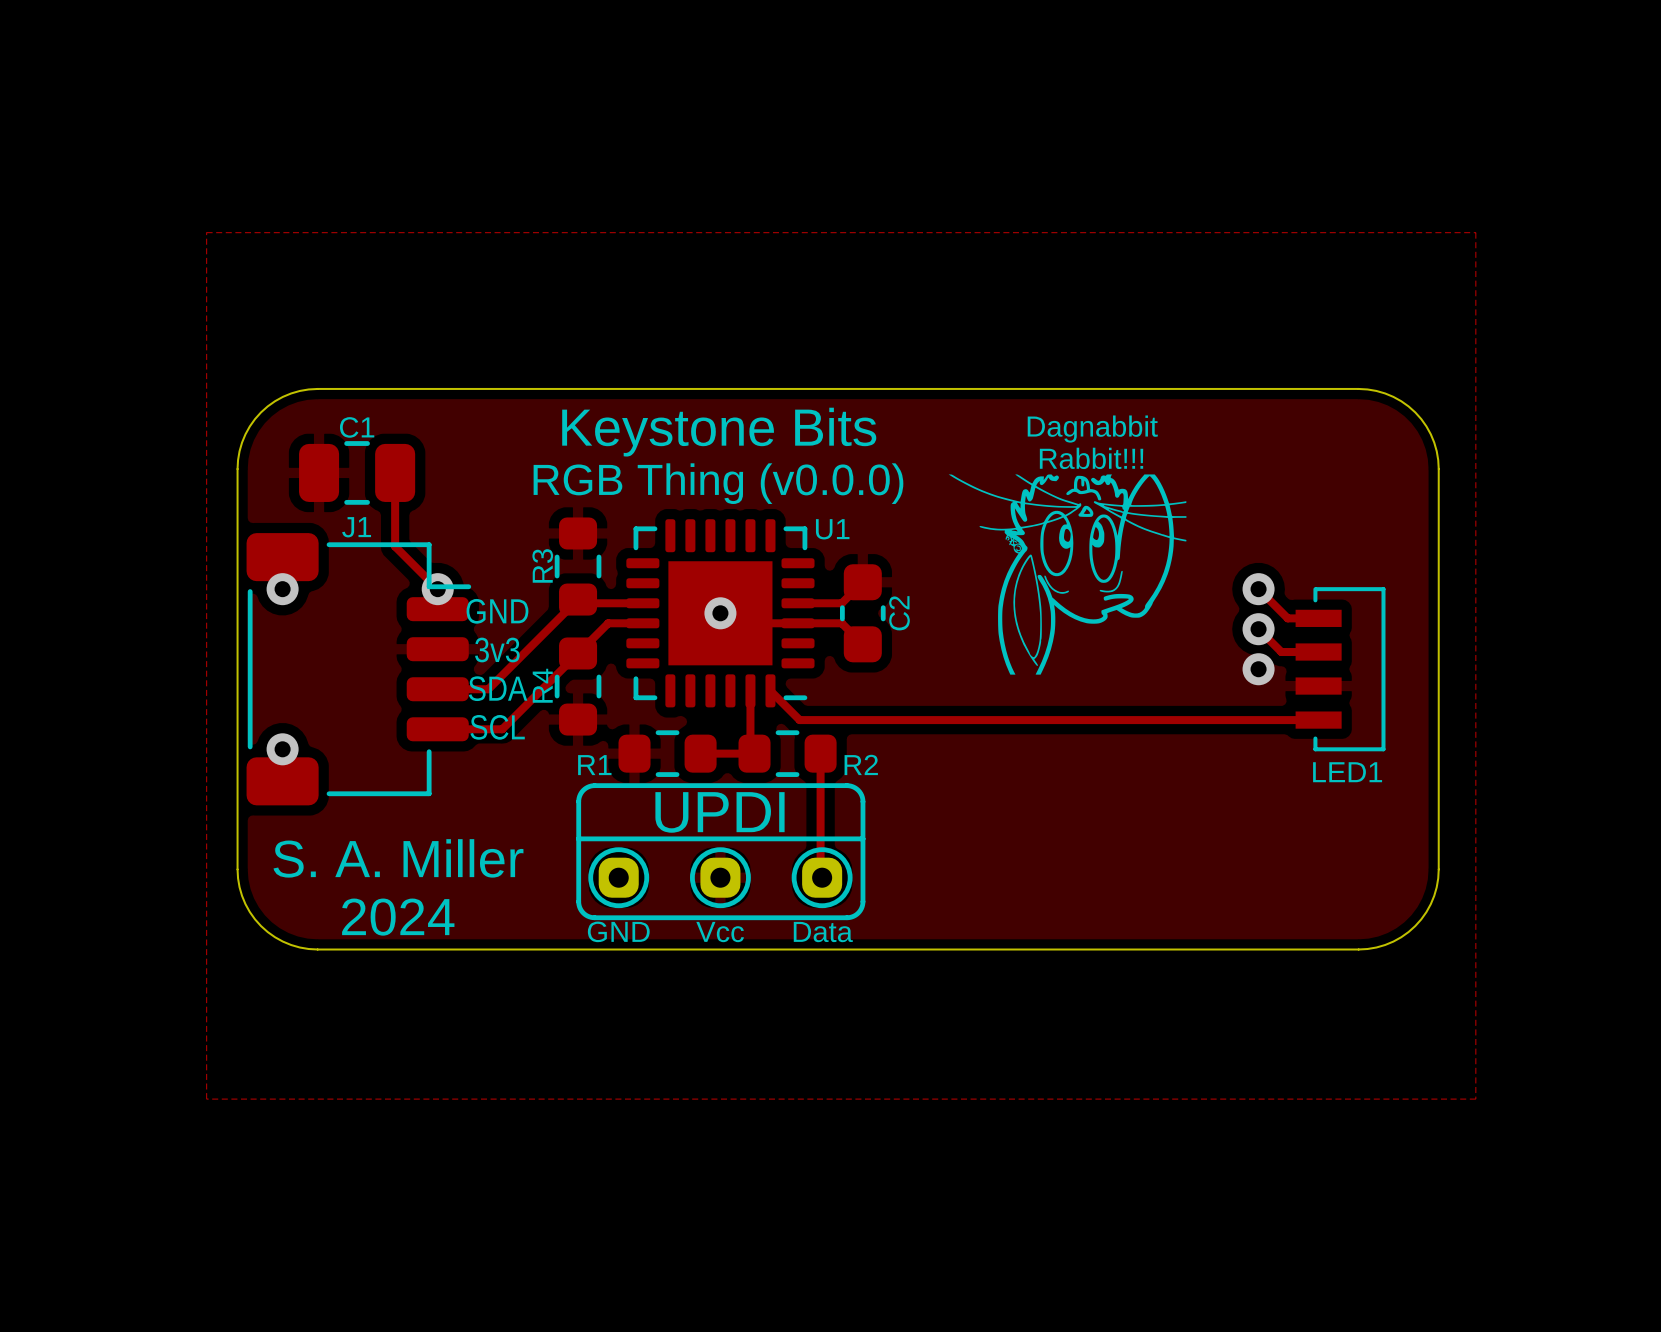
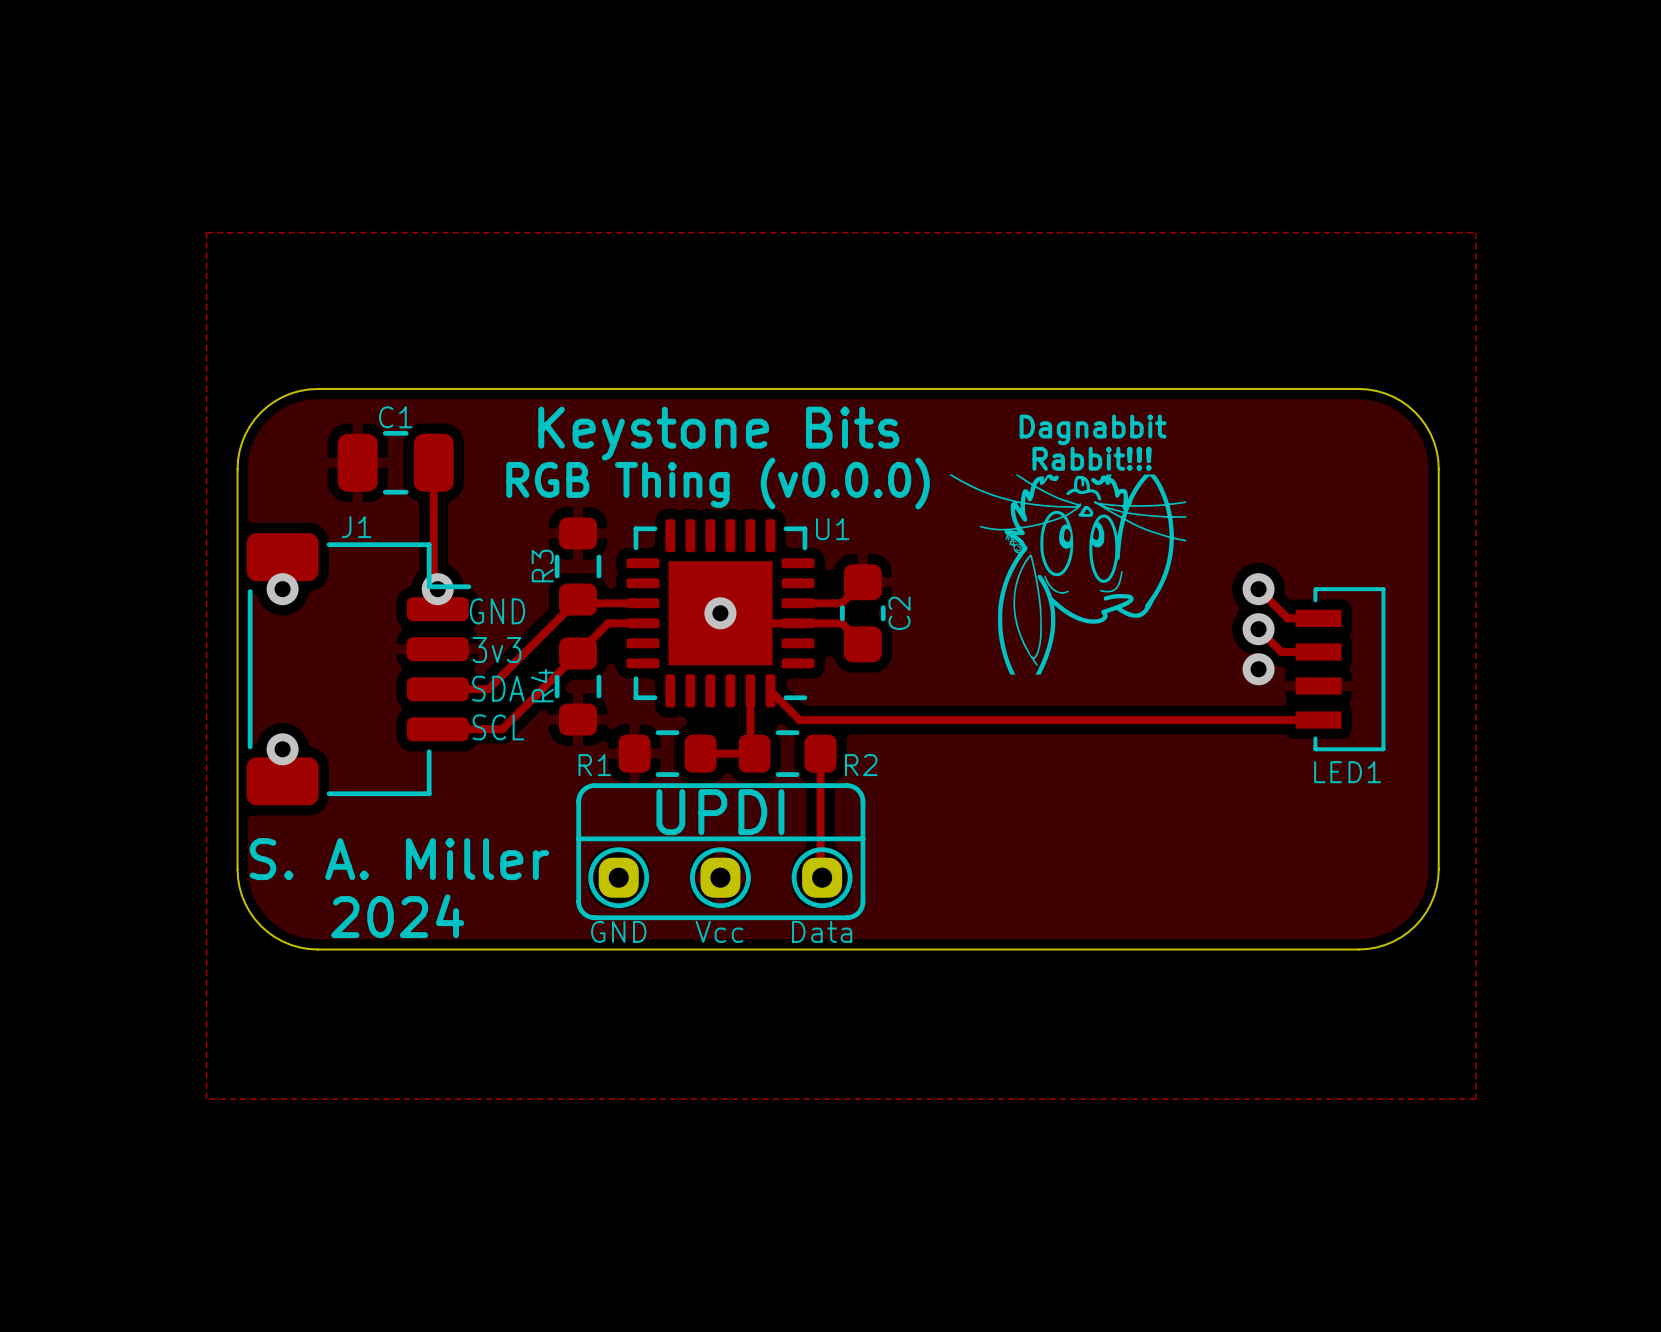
C1 position: (357, 472) -> (395, 462)
track: (395, 472) (395, 546) (433, 585) -> (433, 462) (433, 585)

